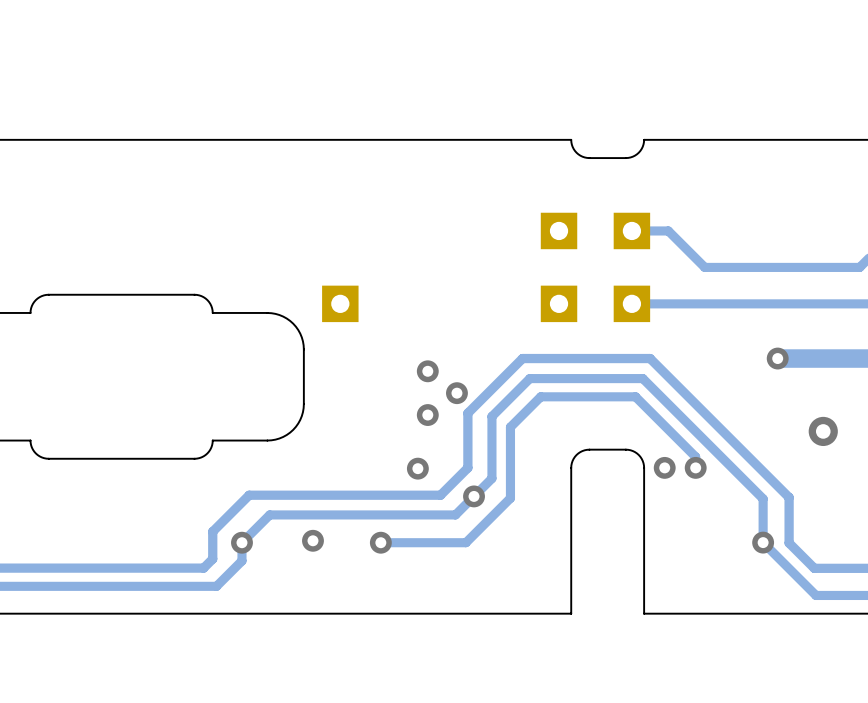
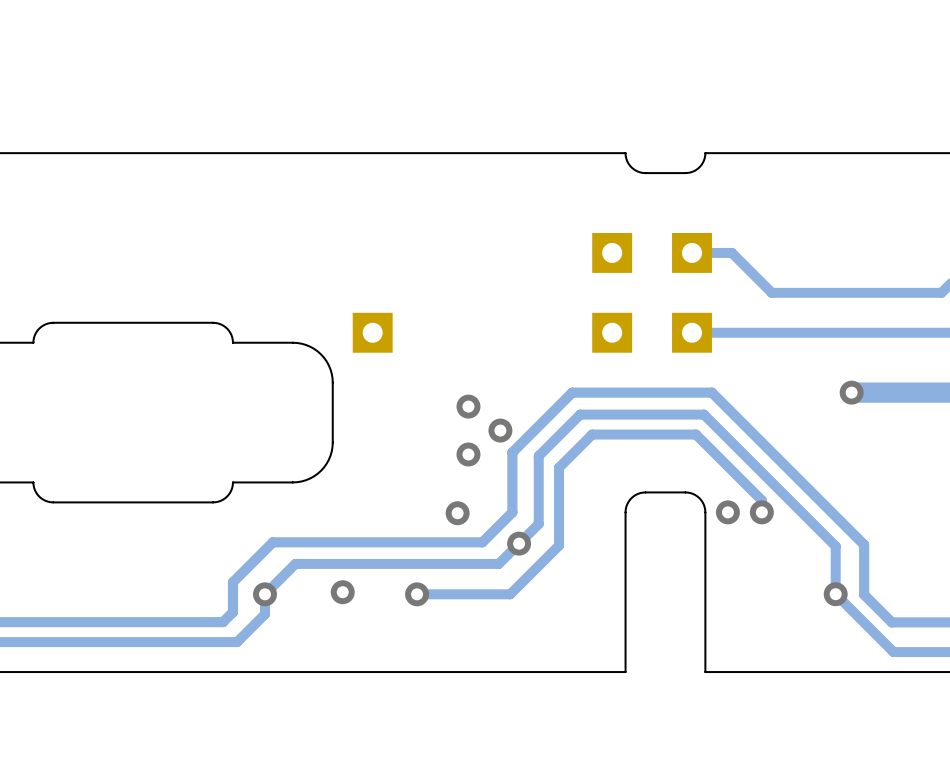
via: (823, 431) -> none

